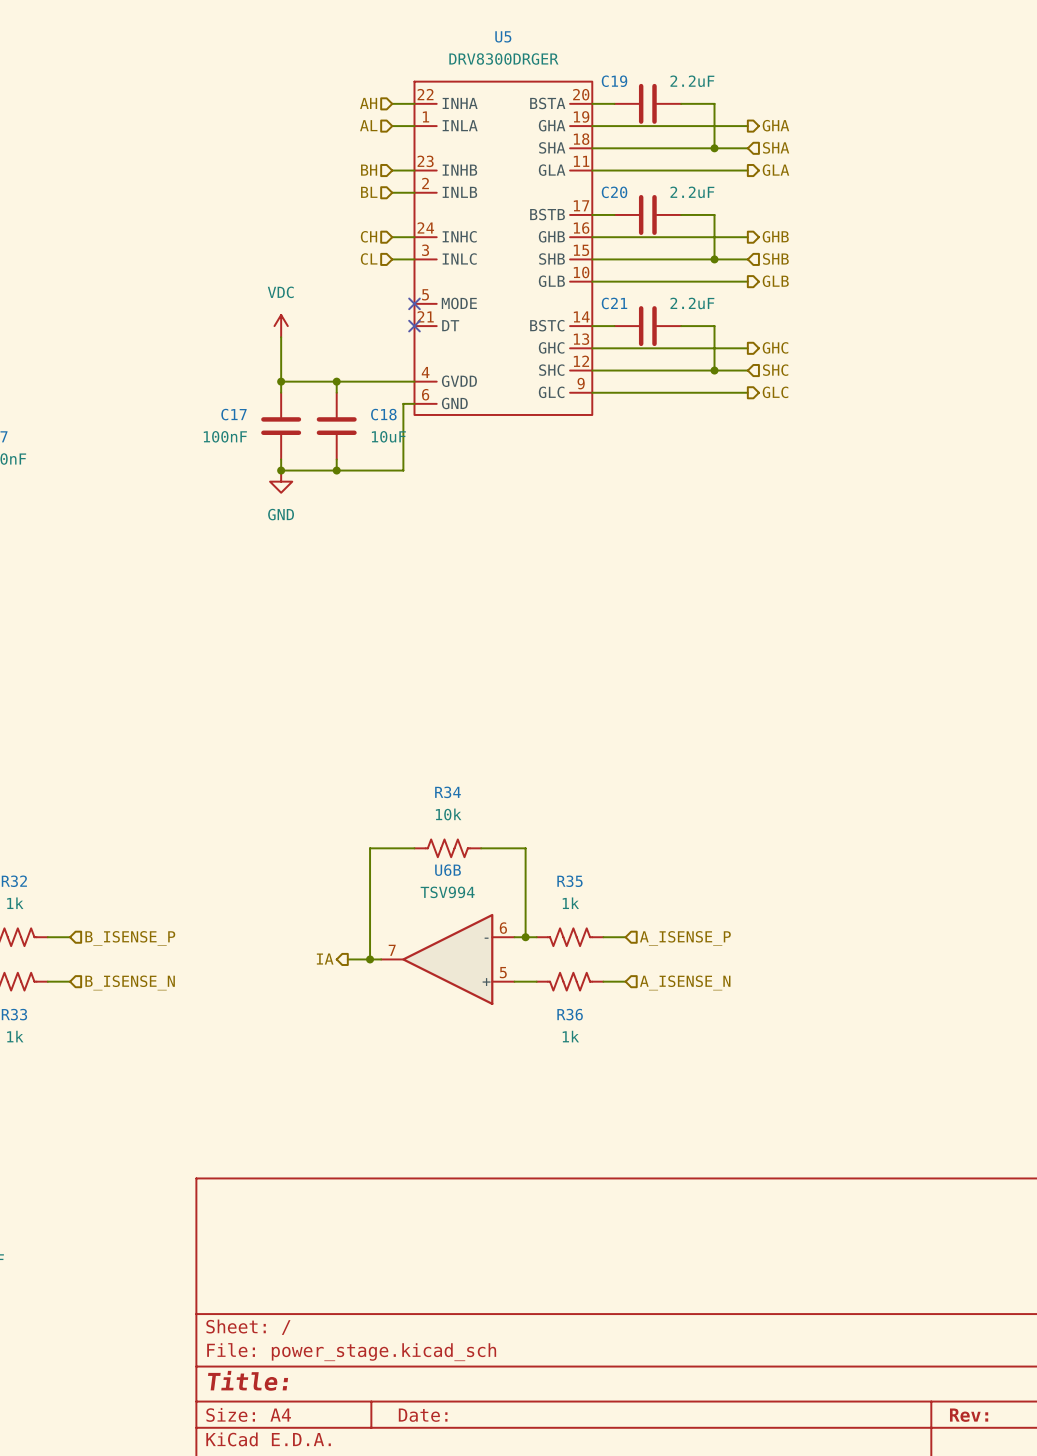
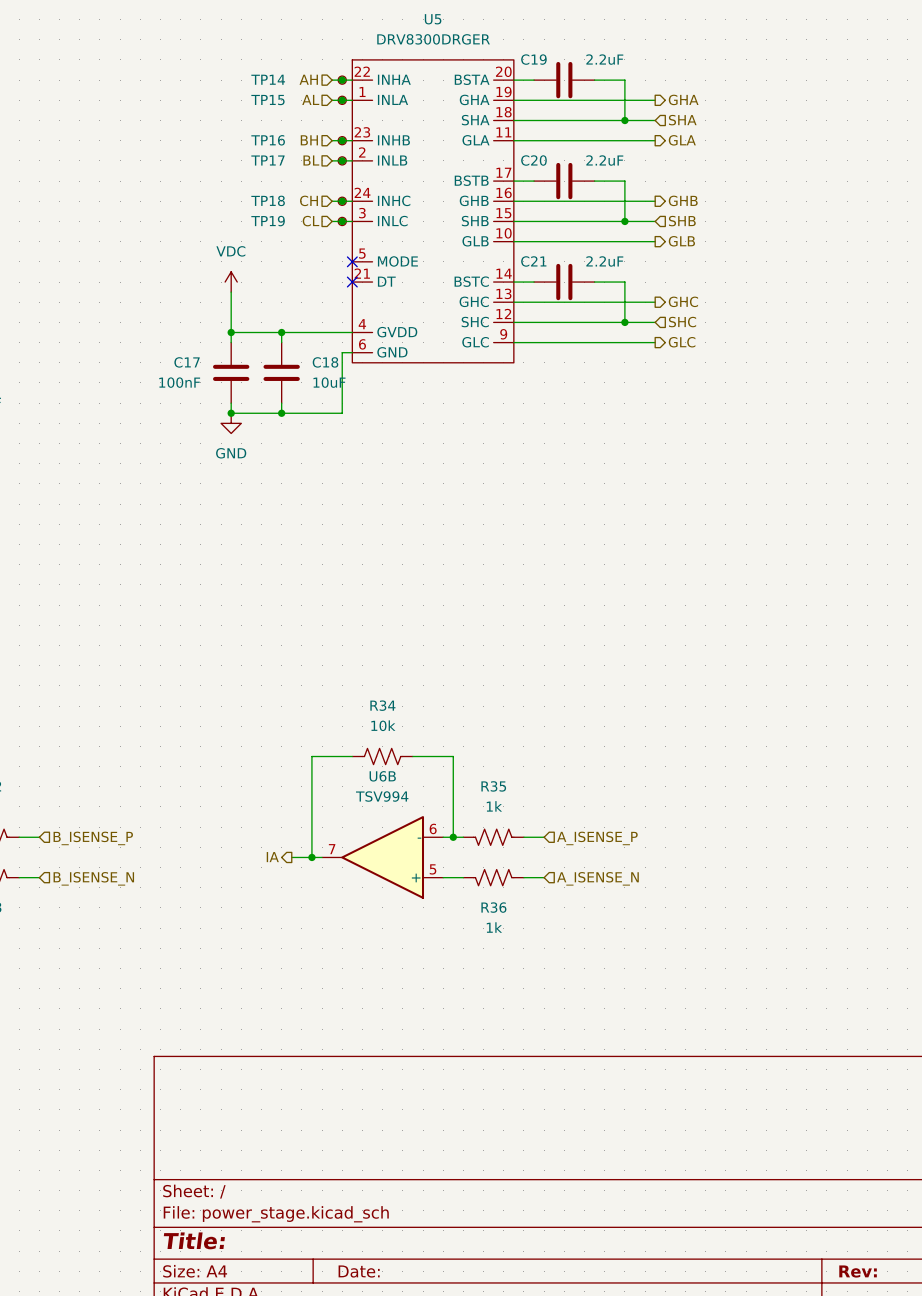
junction: none -> (342, 80)
TP14: none -> (342, 80)
junction: none -> (342, 100)
TP15: none -> (342, 100)
junction: none -> (342, 140)
TP16: none -> (342, 140)
junction: none -> (342, 160)
TP17: none -> (342, 160)
junction: none -> (342, 201)
TP18: none -> (342, 201)
junction: none -> (342, 221)
TP19: none -> (342, 221)

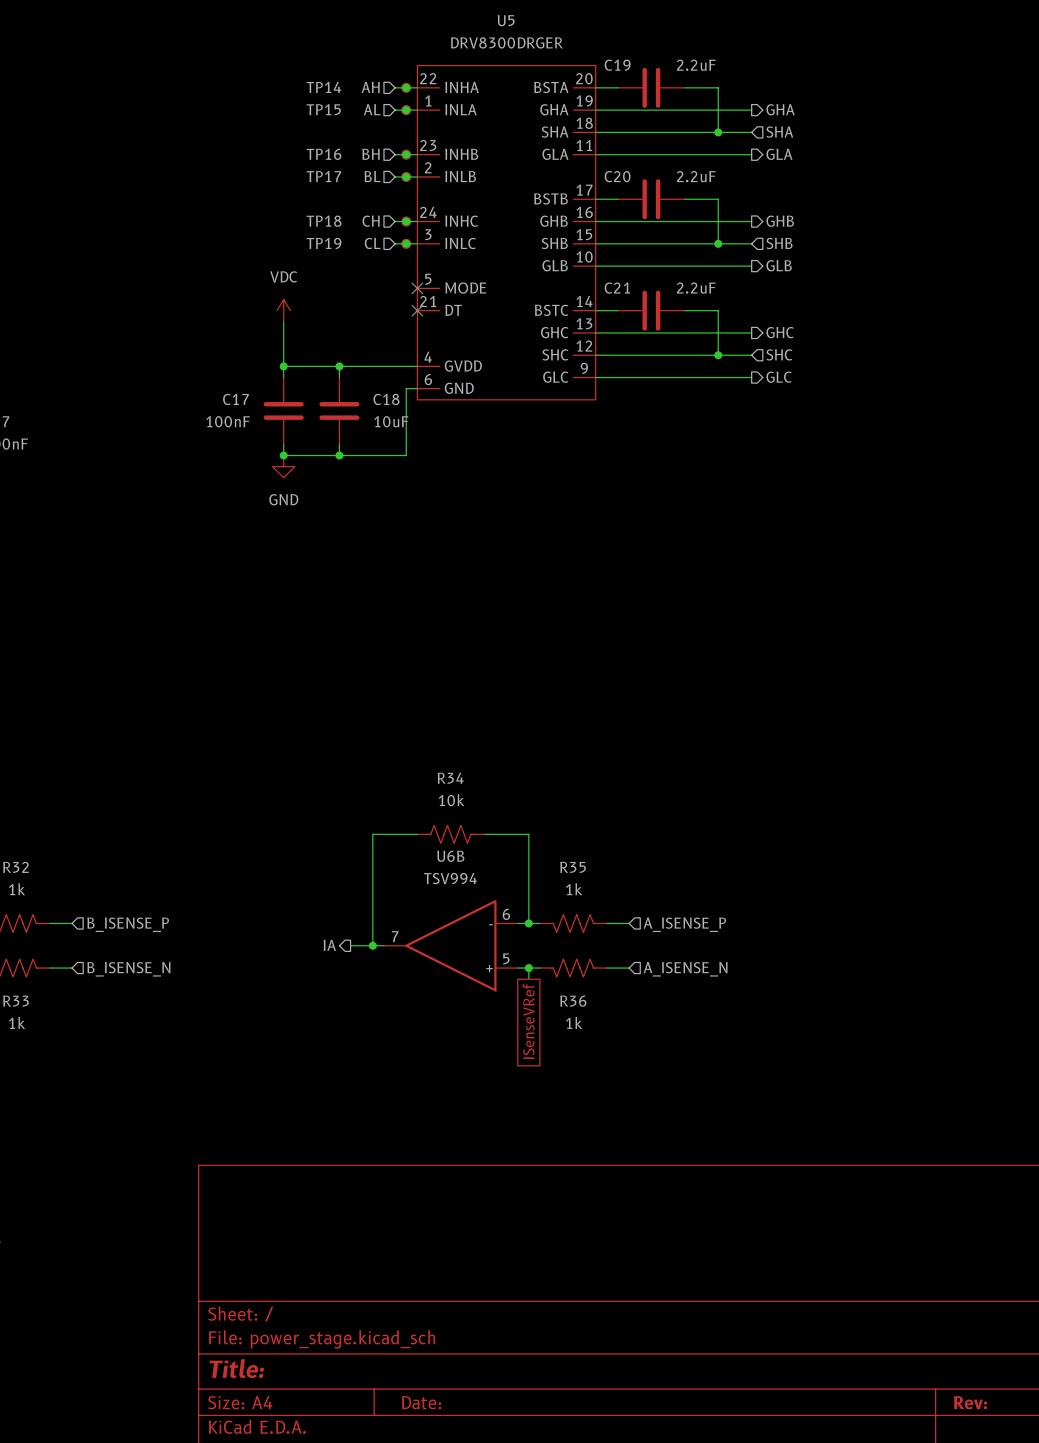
wire: none -> (528, 968) (528, 979)
junction: none -> (528, 968)
global label: none -> ISenseVRef (528, 1021)

